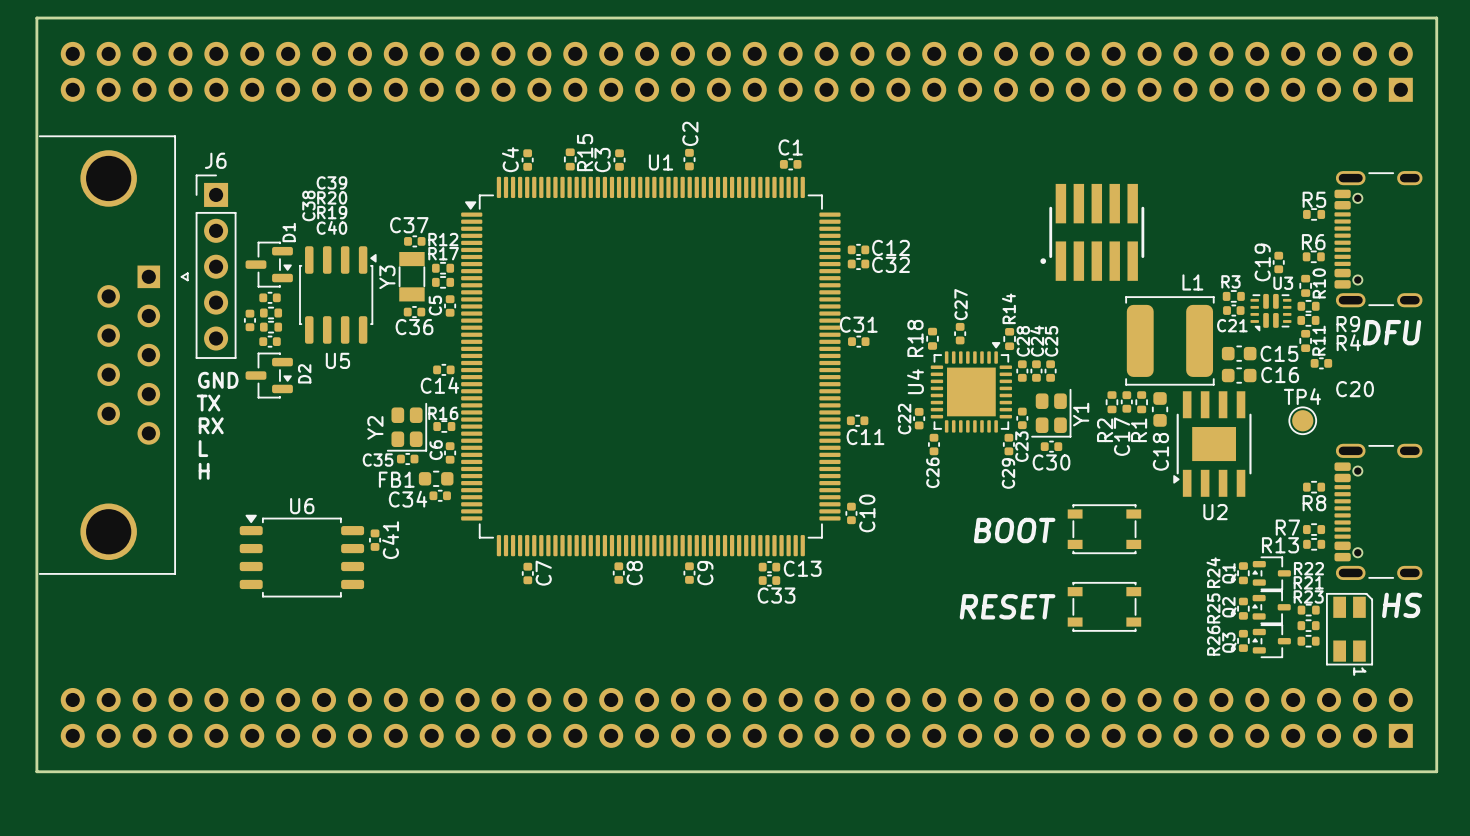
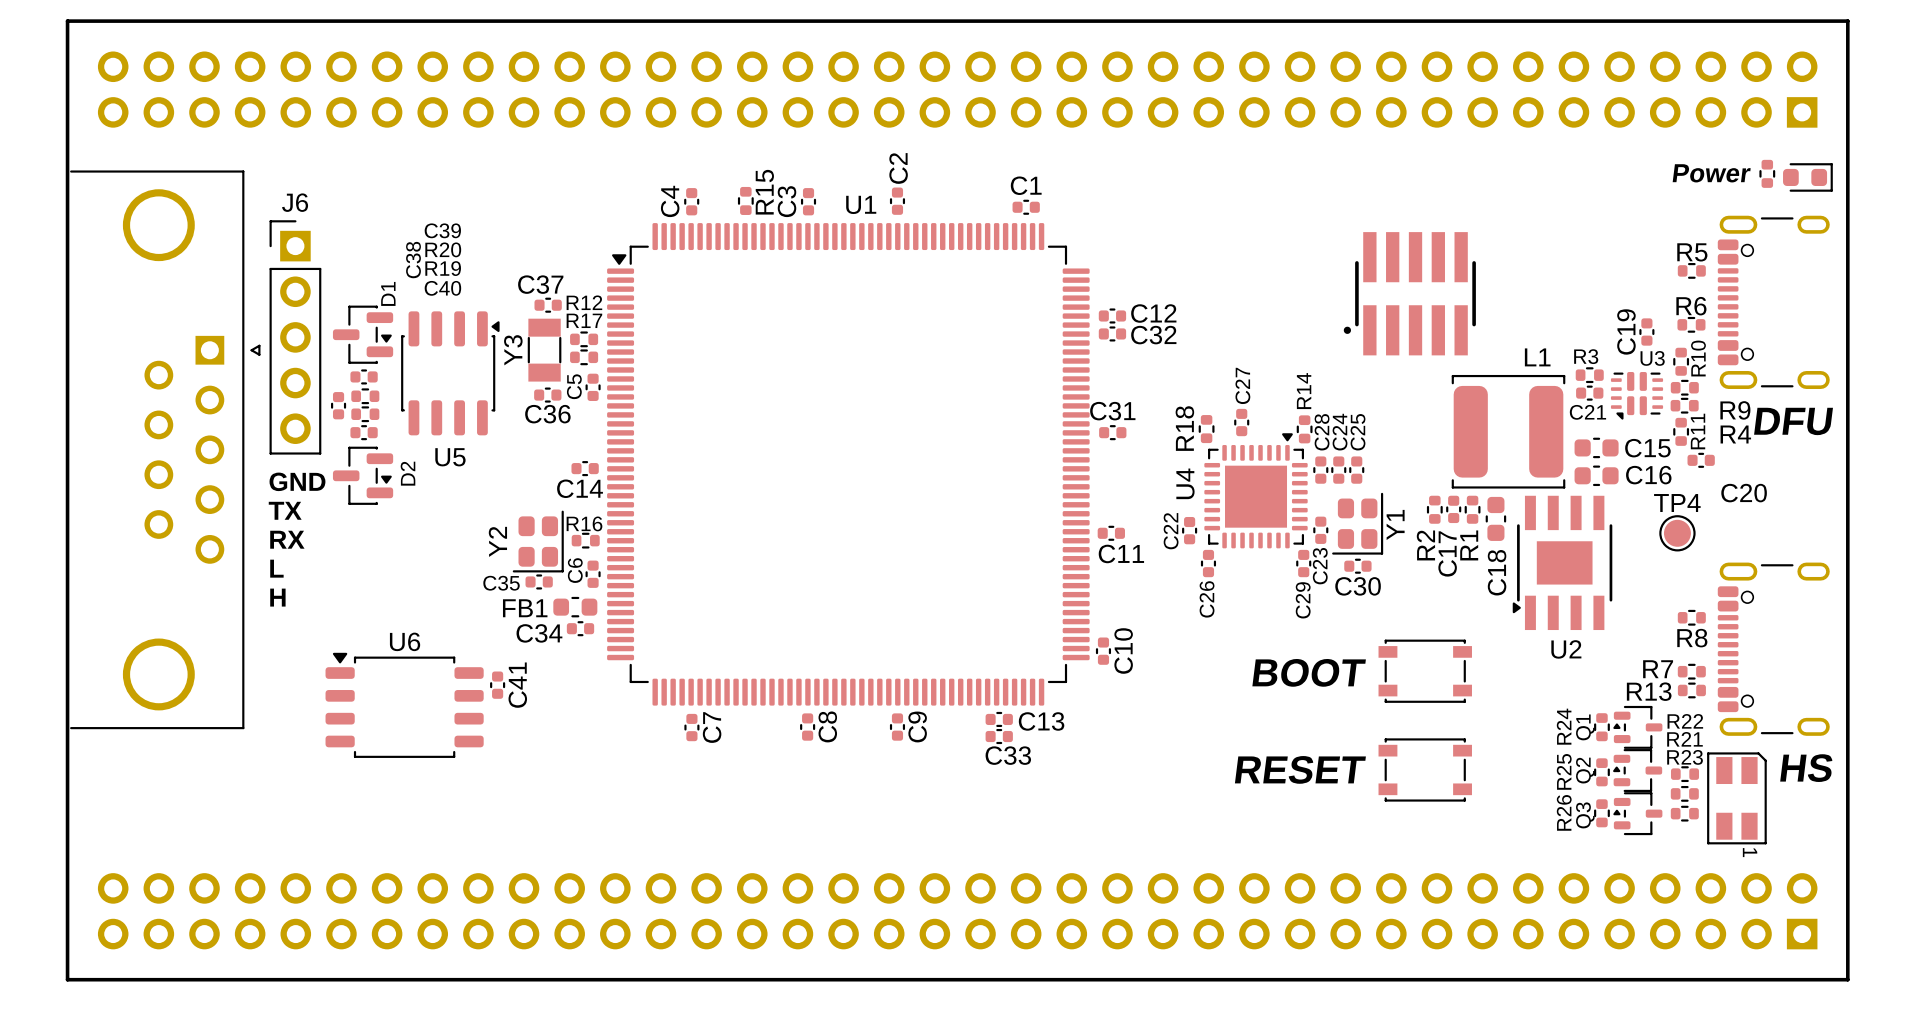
text: none -> Power (1711, 173)
part: none -> (1767, 173)
part: none -> (1807, 177)

